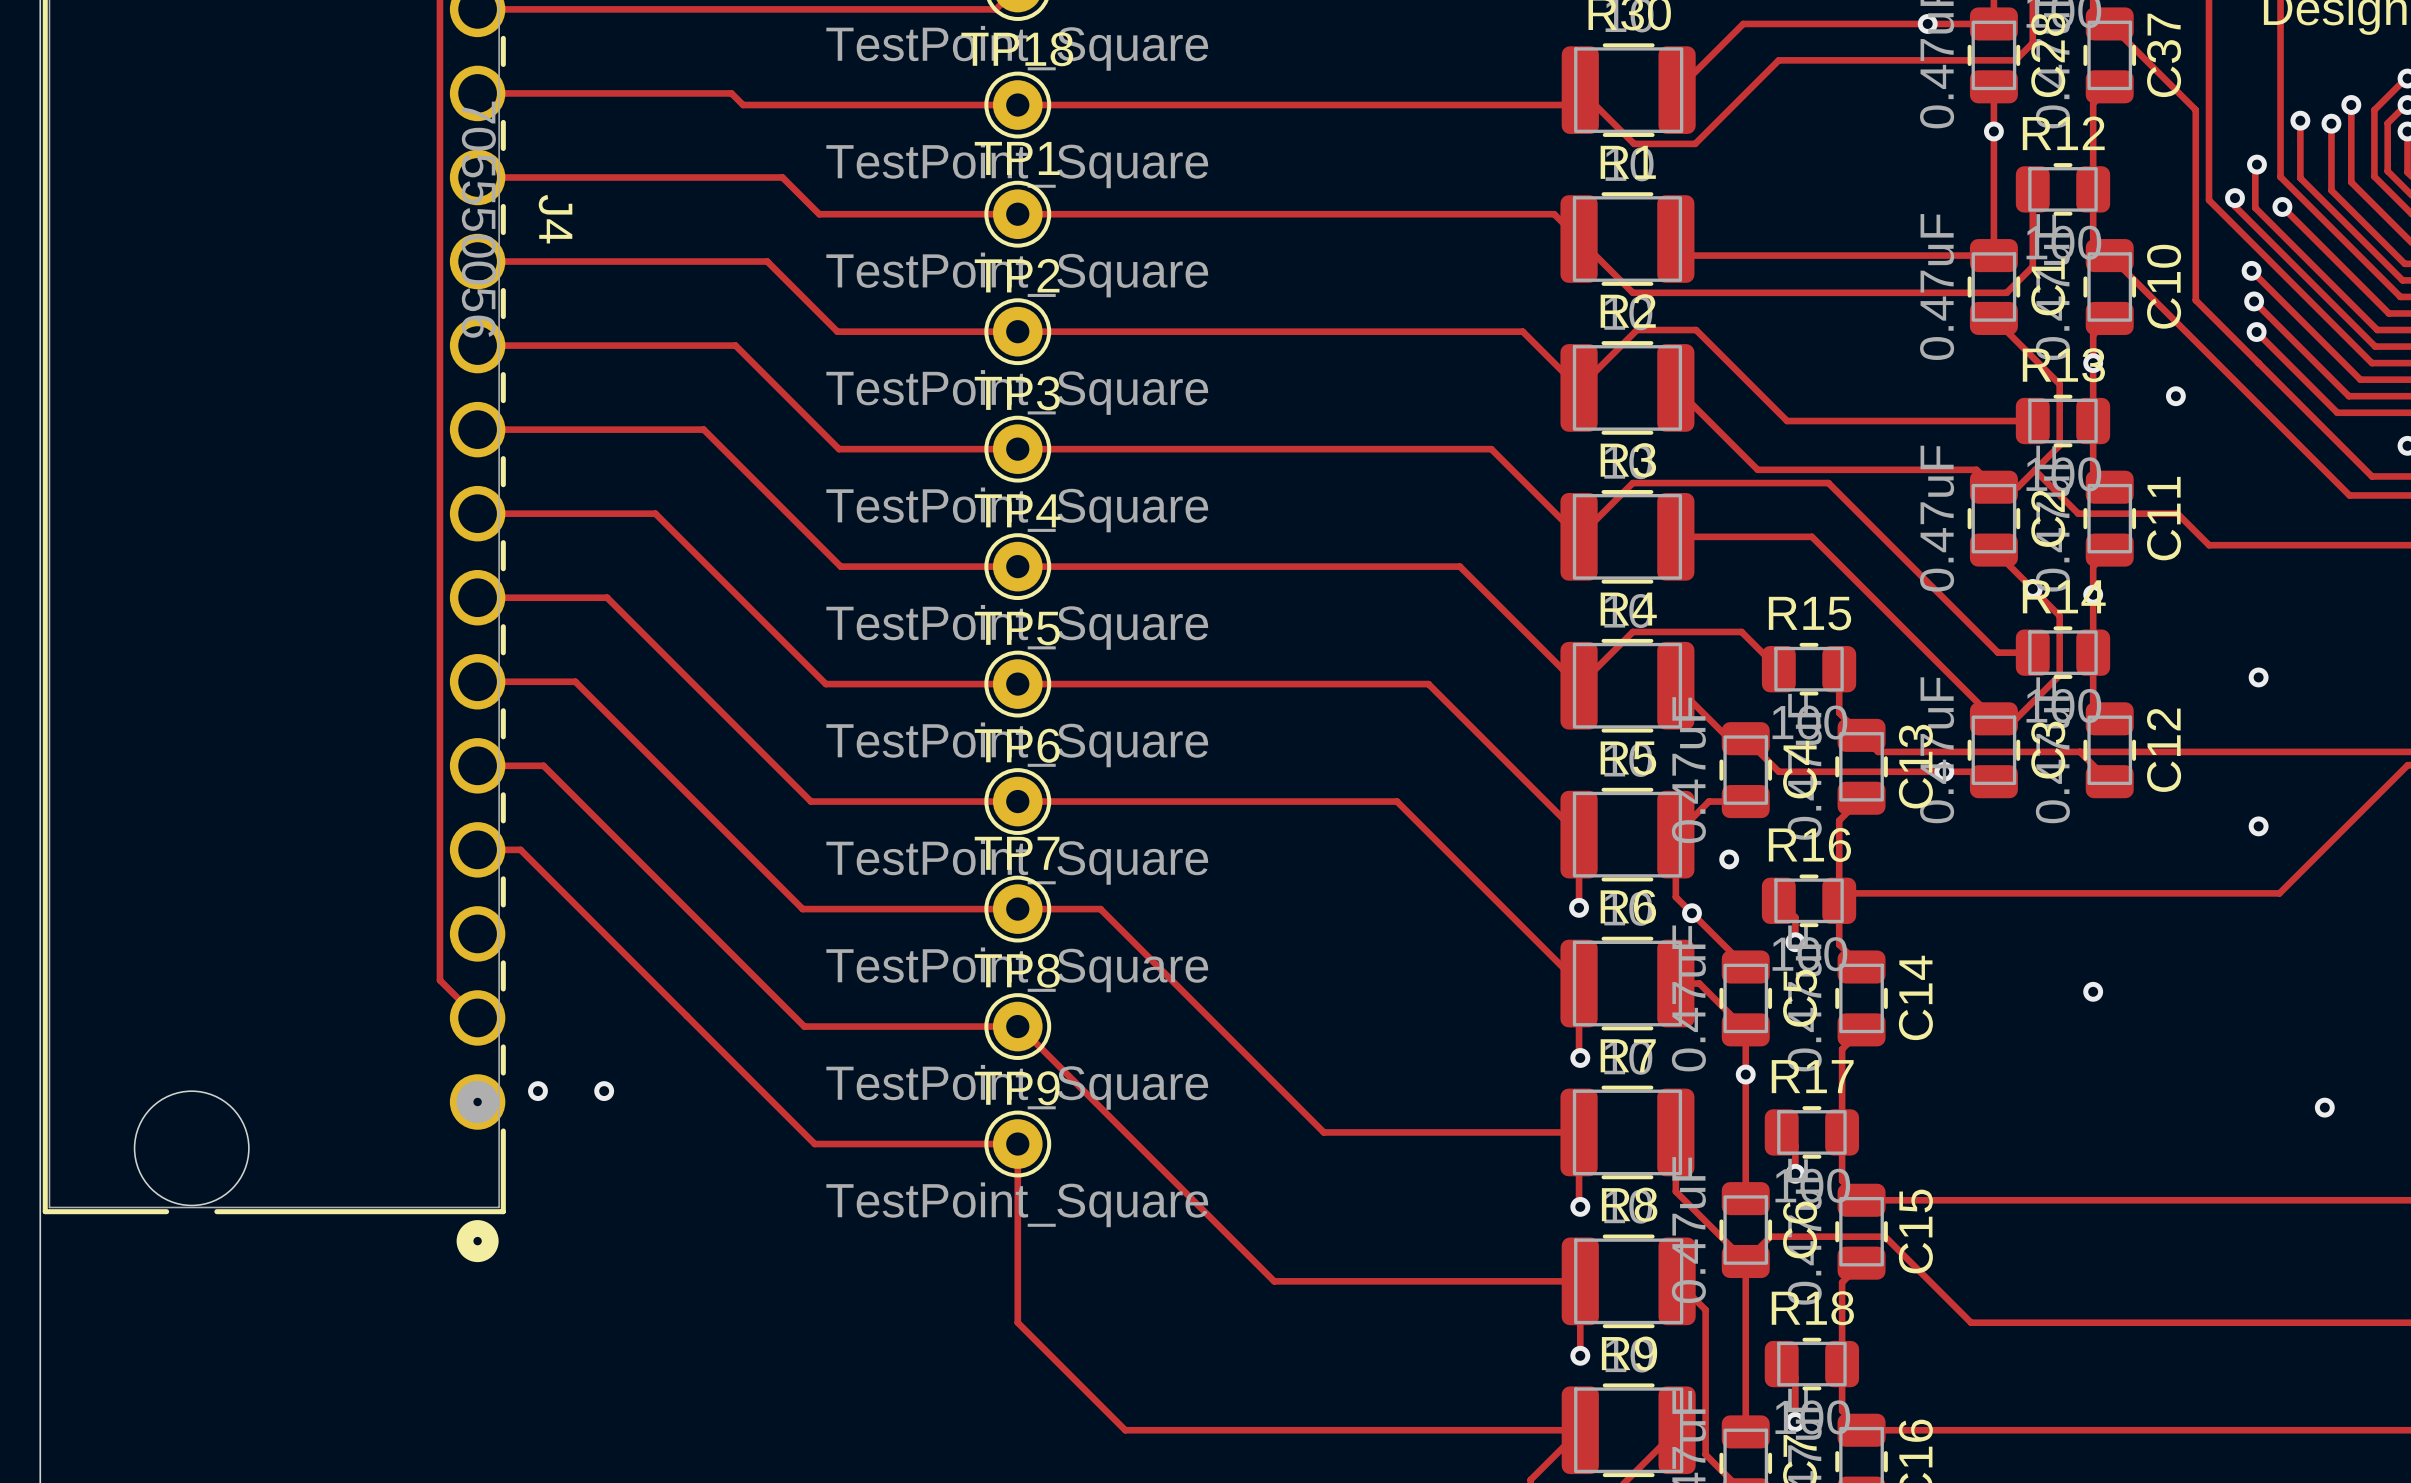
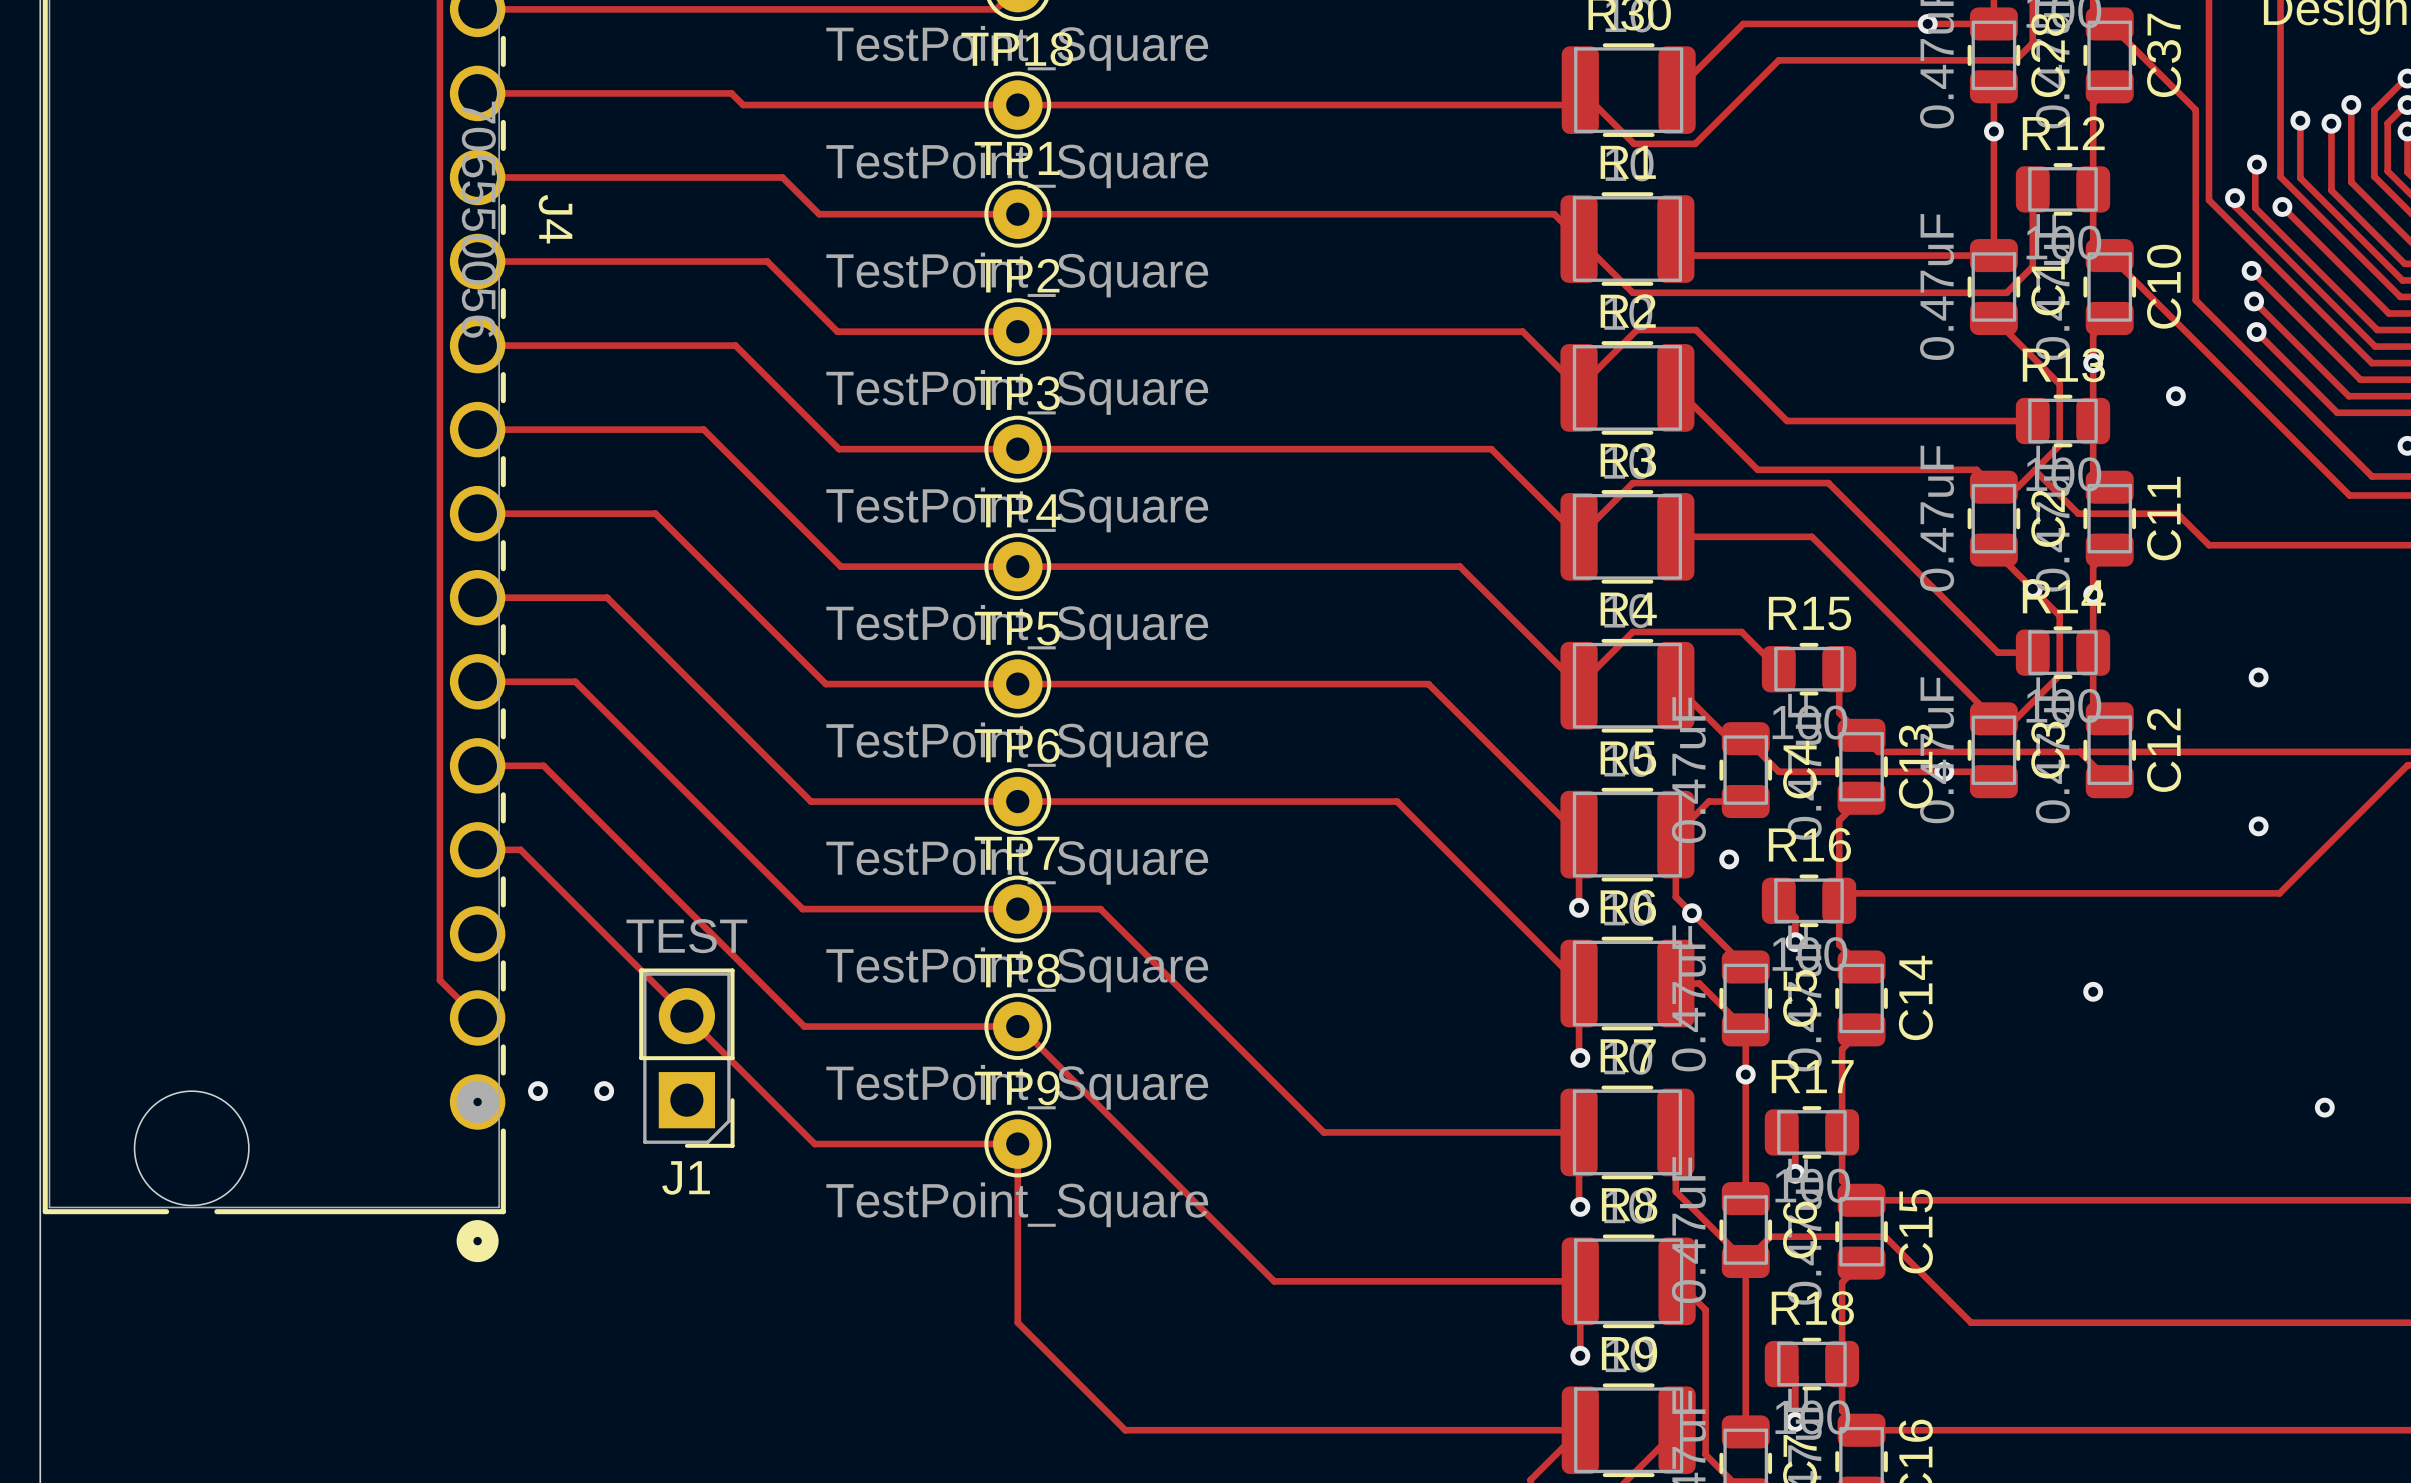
J1: none -> TEST (686, 1058)

